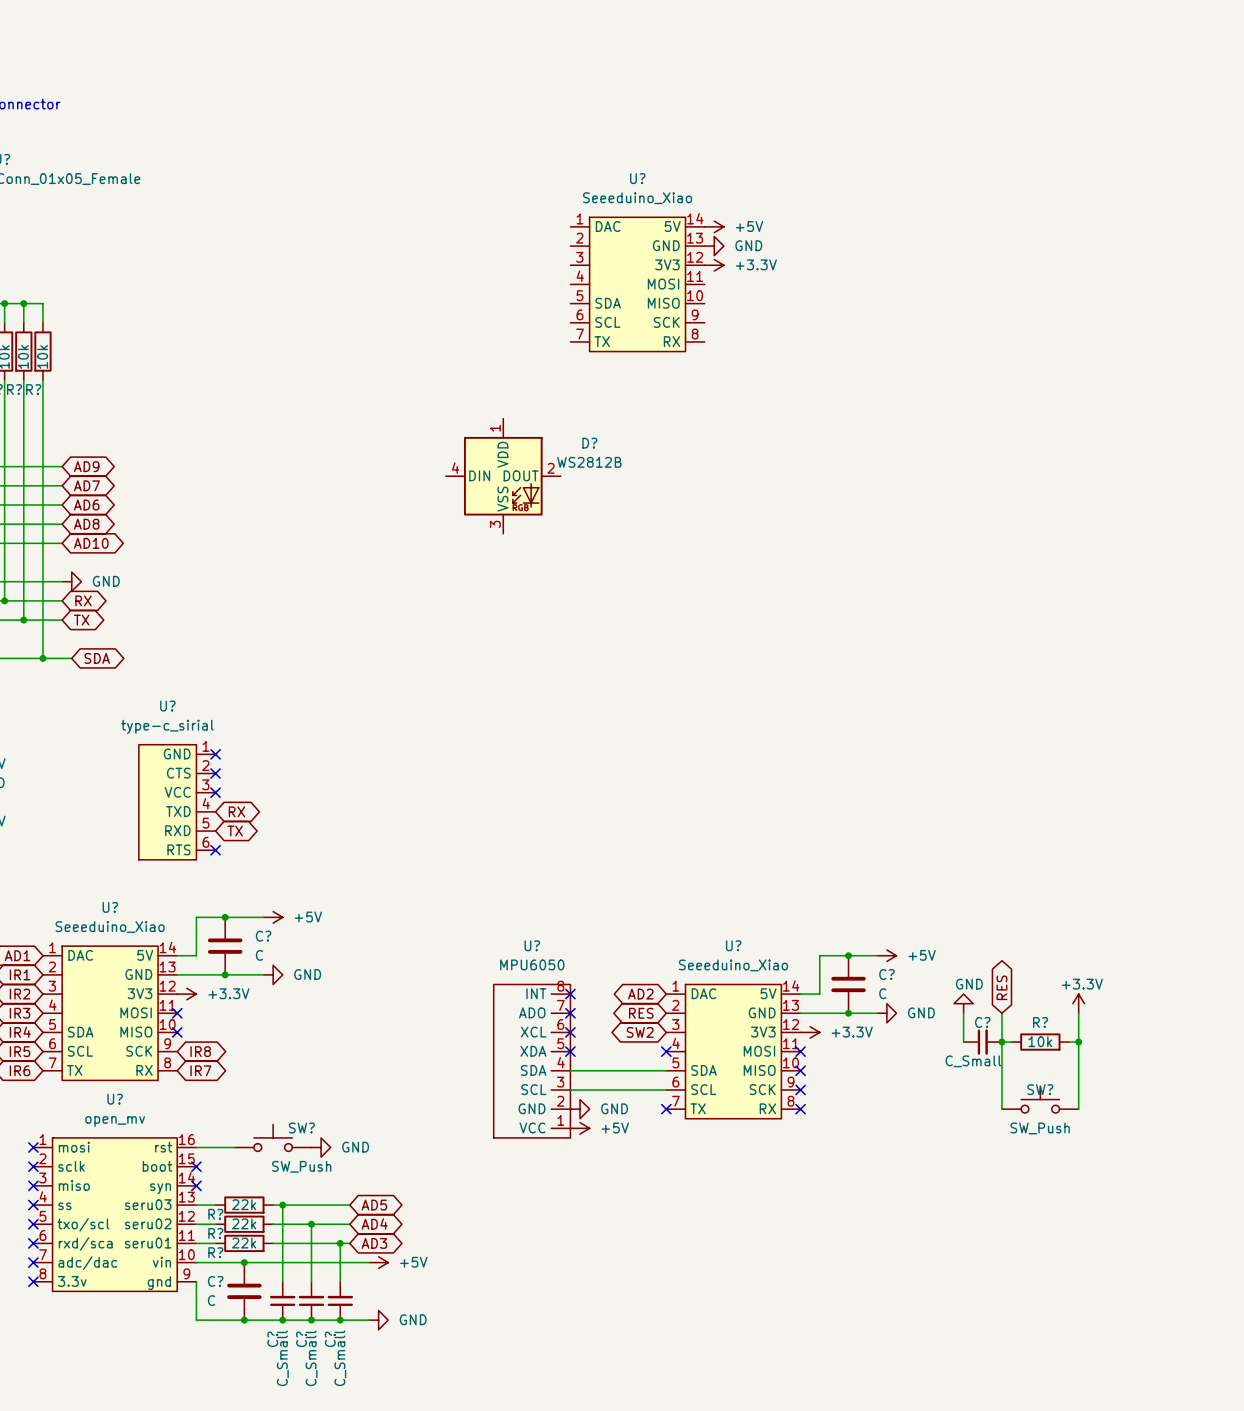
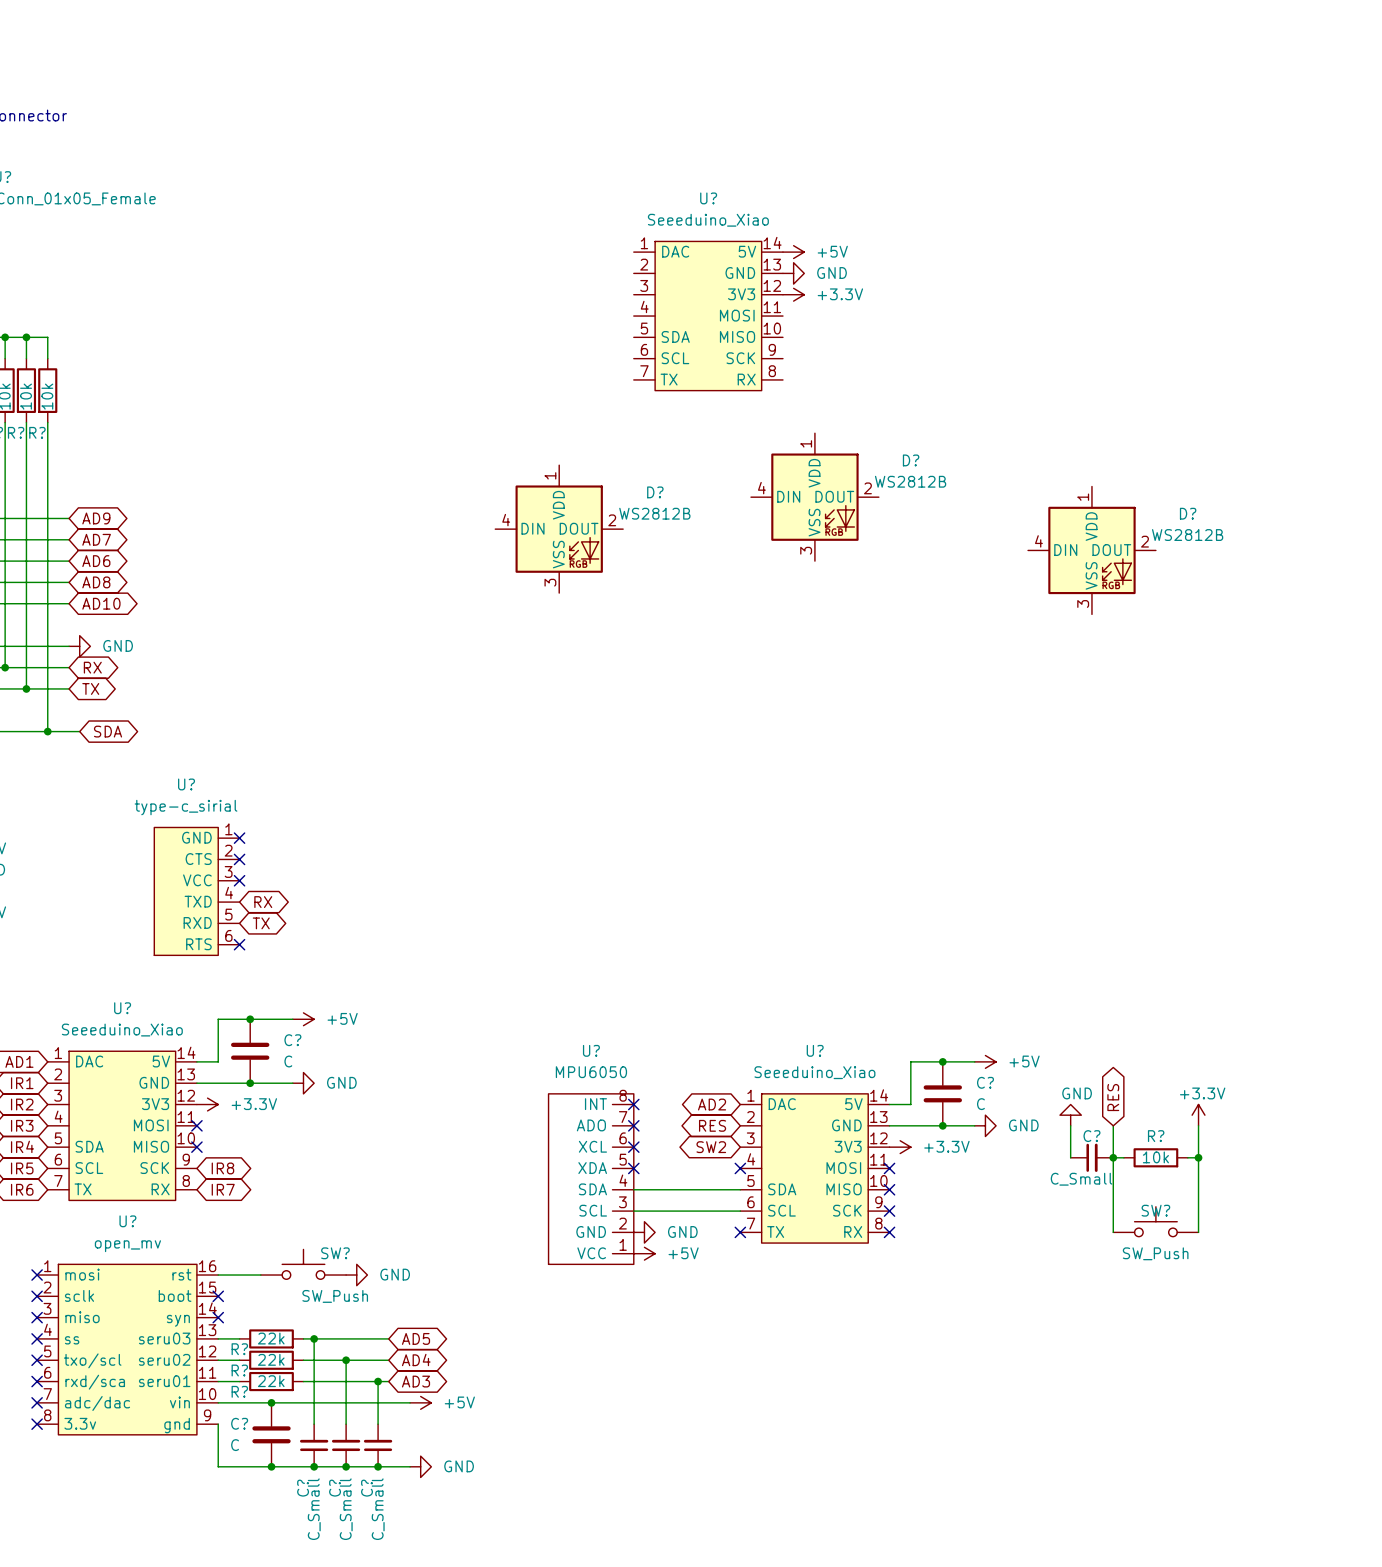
D?: none -> WS2812B (814, 497)
D?: none -> WS2812B (1091, 550)

